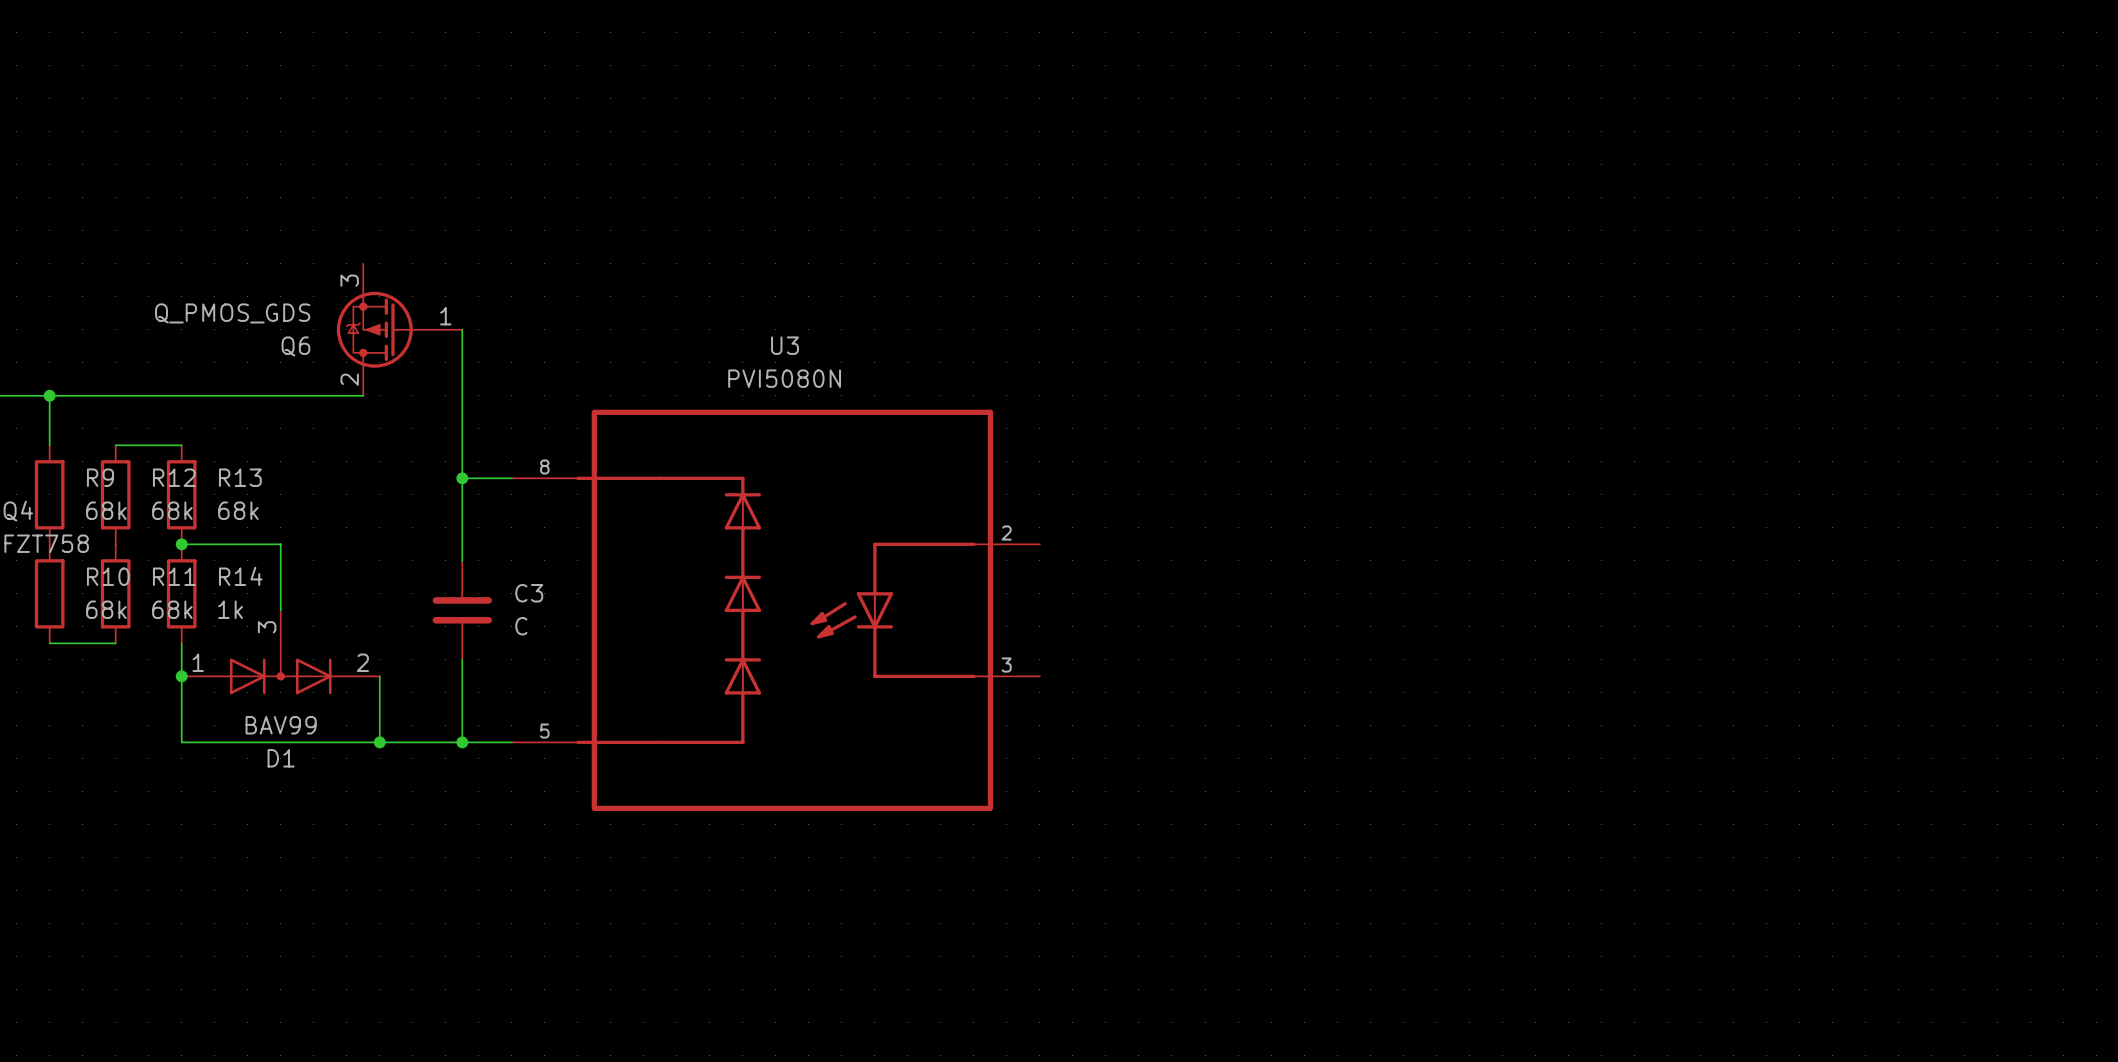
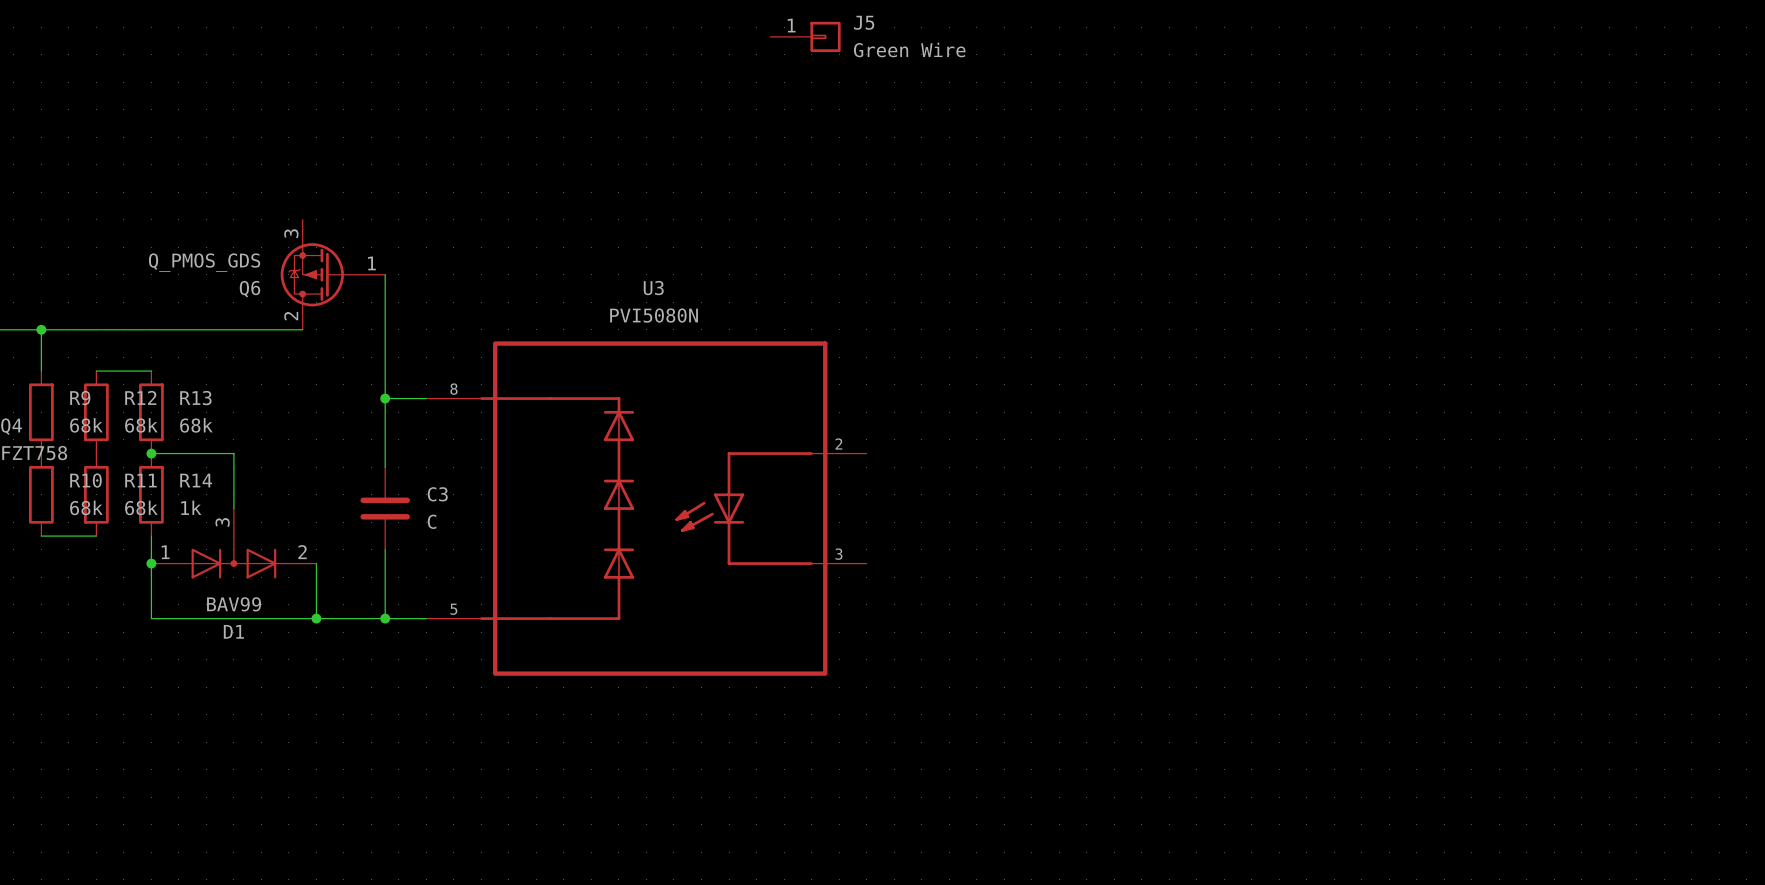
J5: none -> Green Wire (805, 36)

